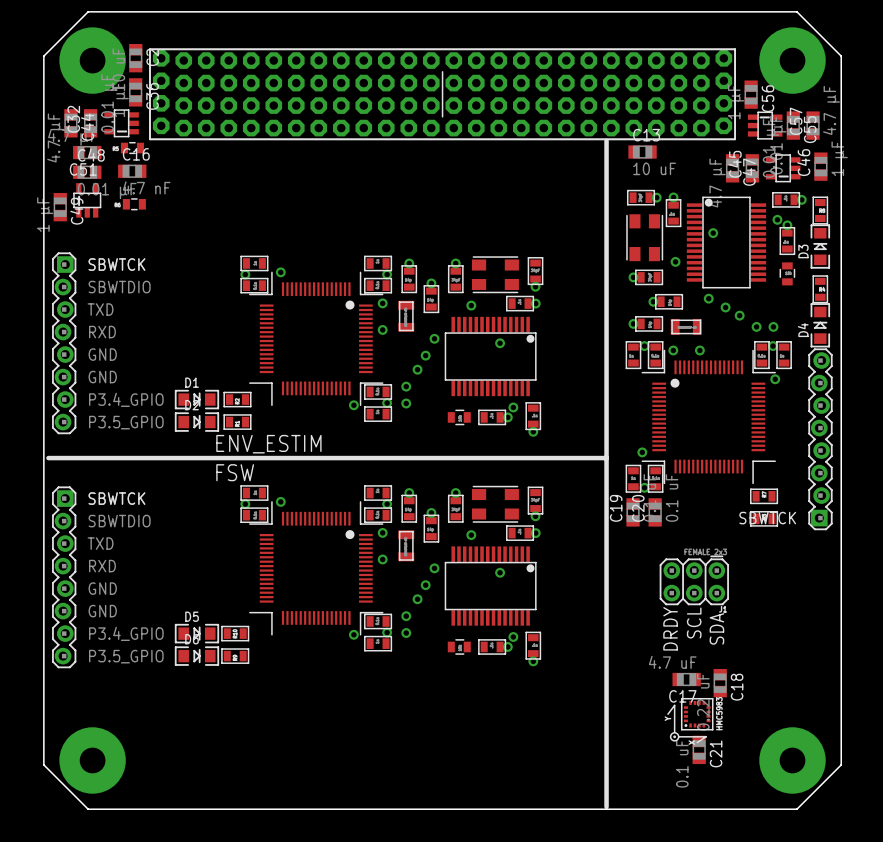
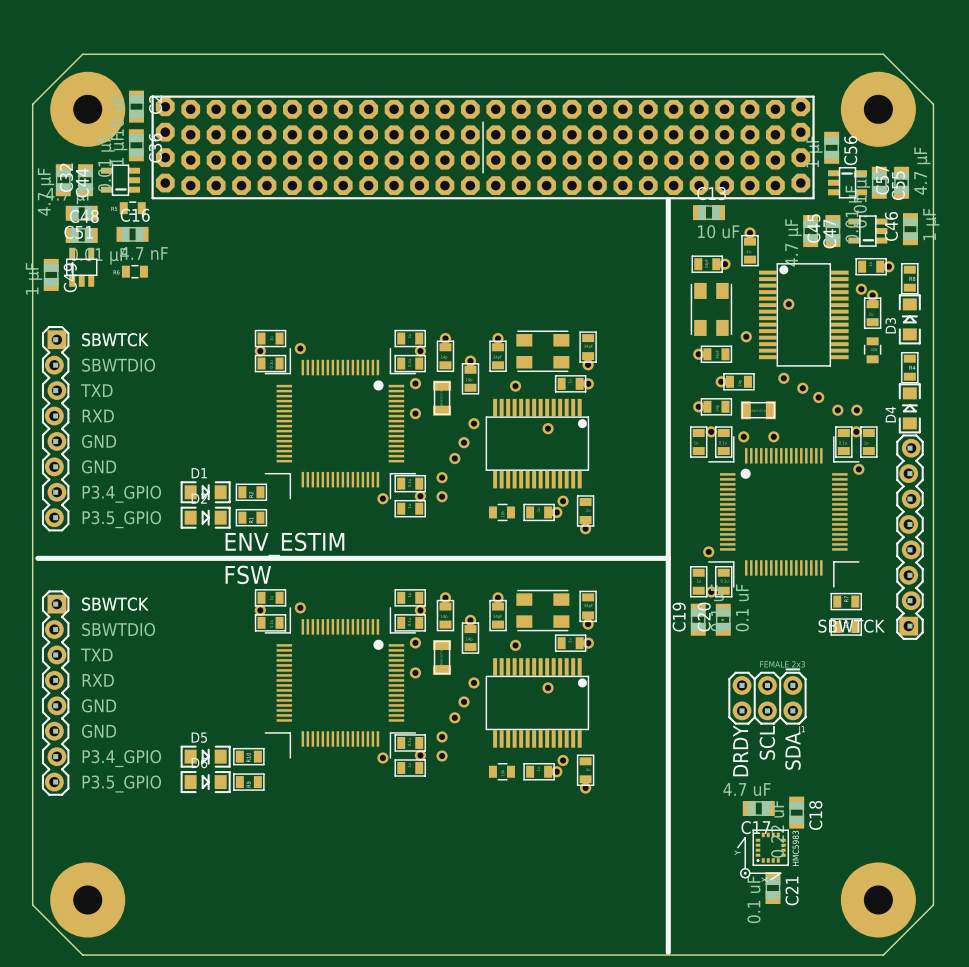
part: none -> (792, 412)
part: (716, 341) -> none

